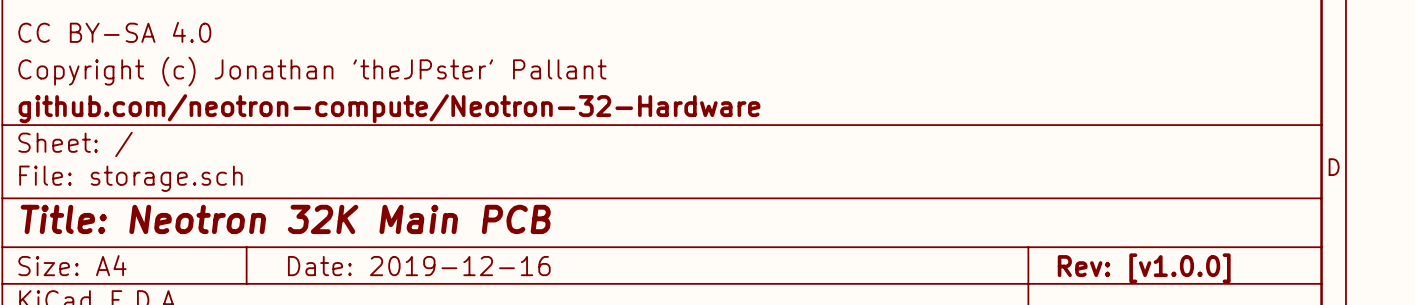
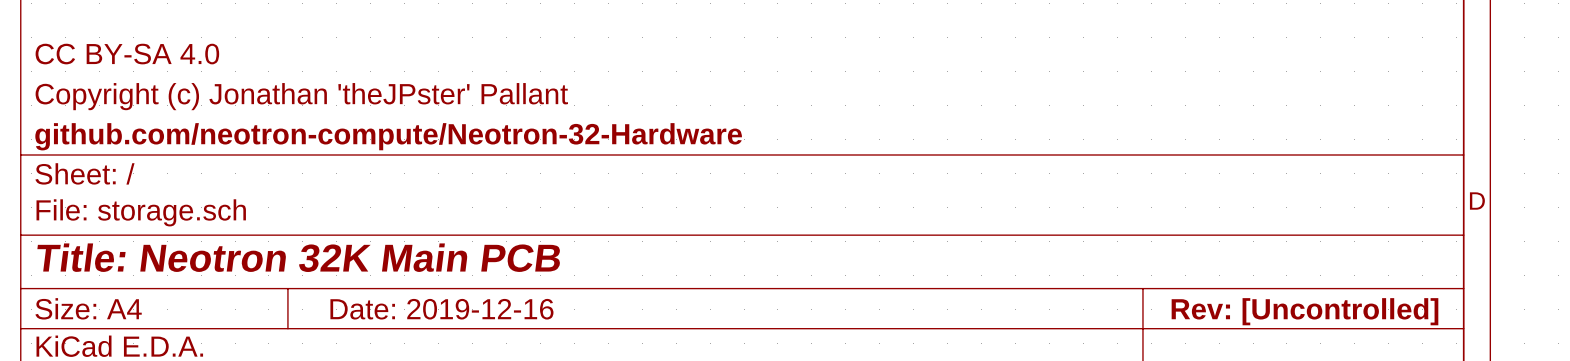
title block: Rev: [v1.0.0] (1144, 268) -> Rev: [Uncontrolled] (1304, 311)

